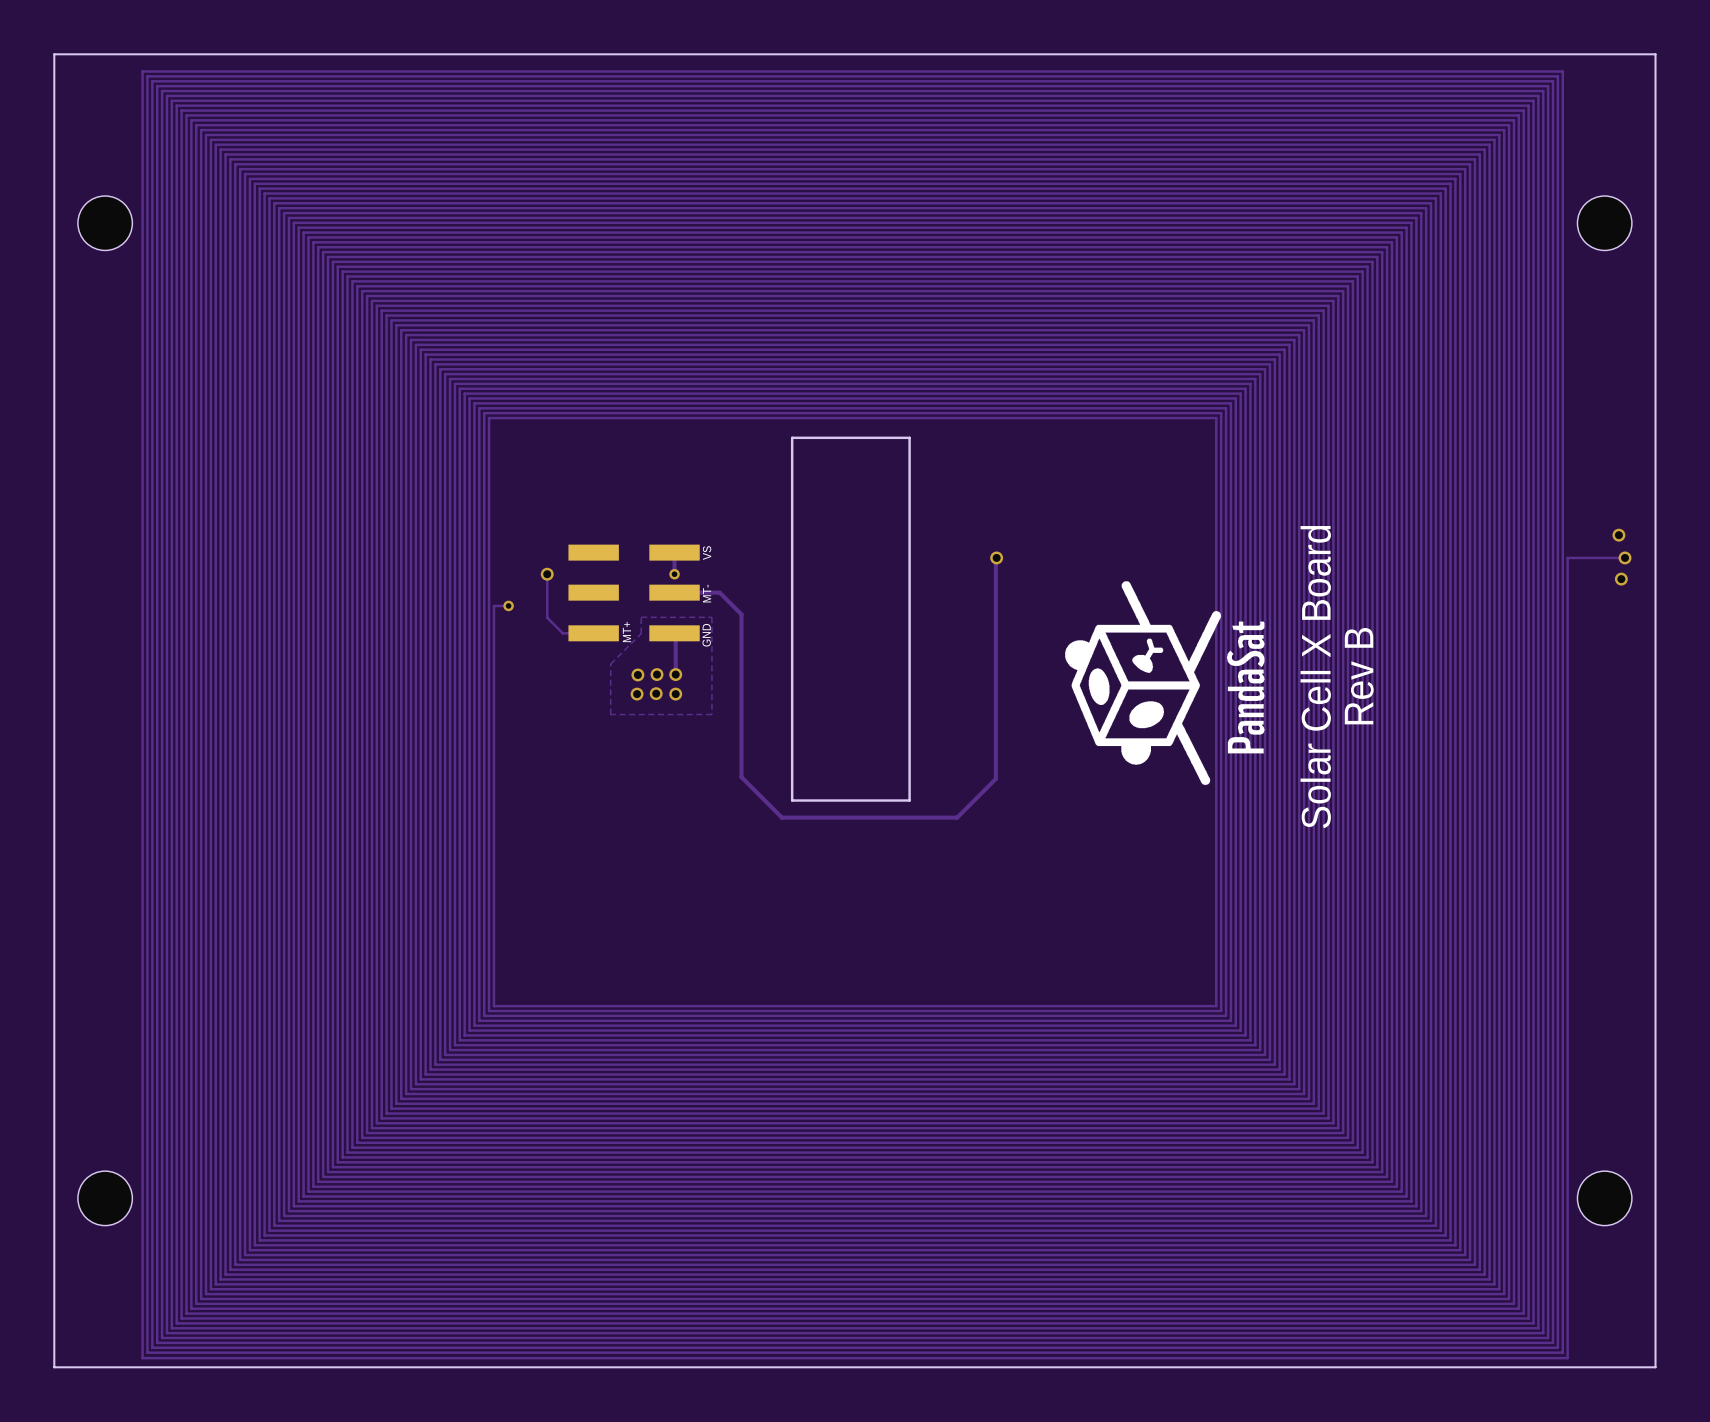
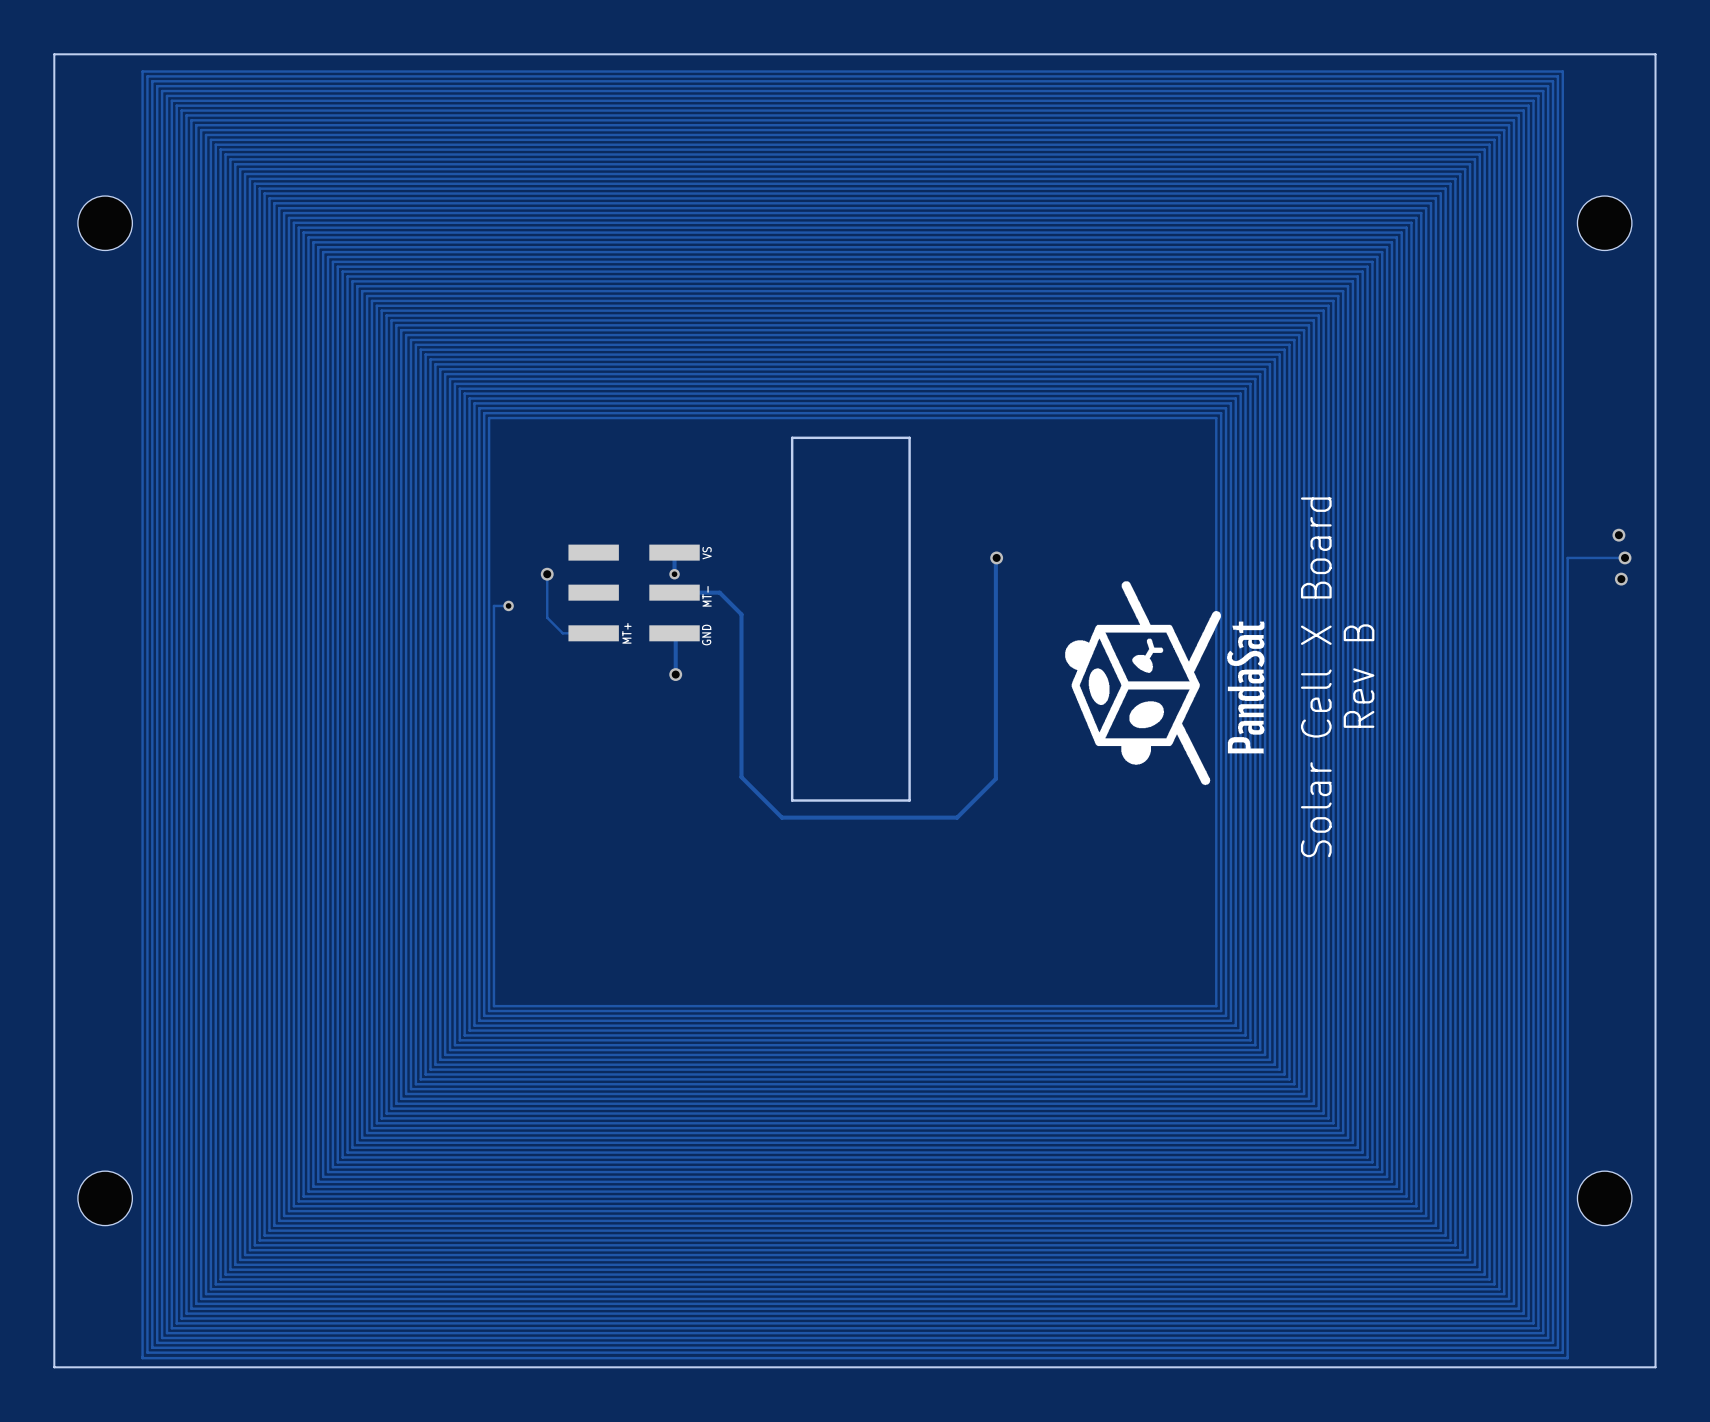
zone outline: (711, 617) (711, 714) (610, 714) (610, 664) (641, 633) (641, 617) (711, 617) -> none
via: (637, 674) -> none
via: (657, 674) -> none
via: (656, 693) -> none
via: (637, 694) -> none
via: (675, 694) -> none

